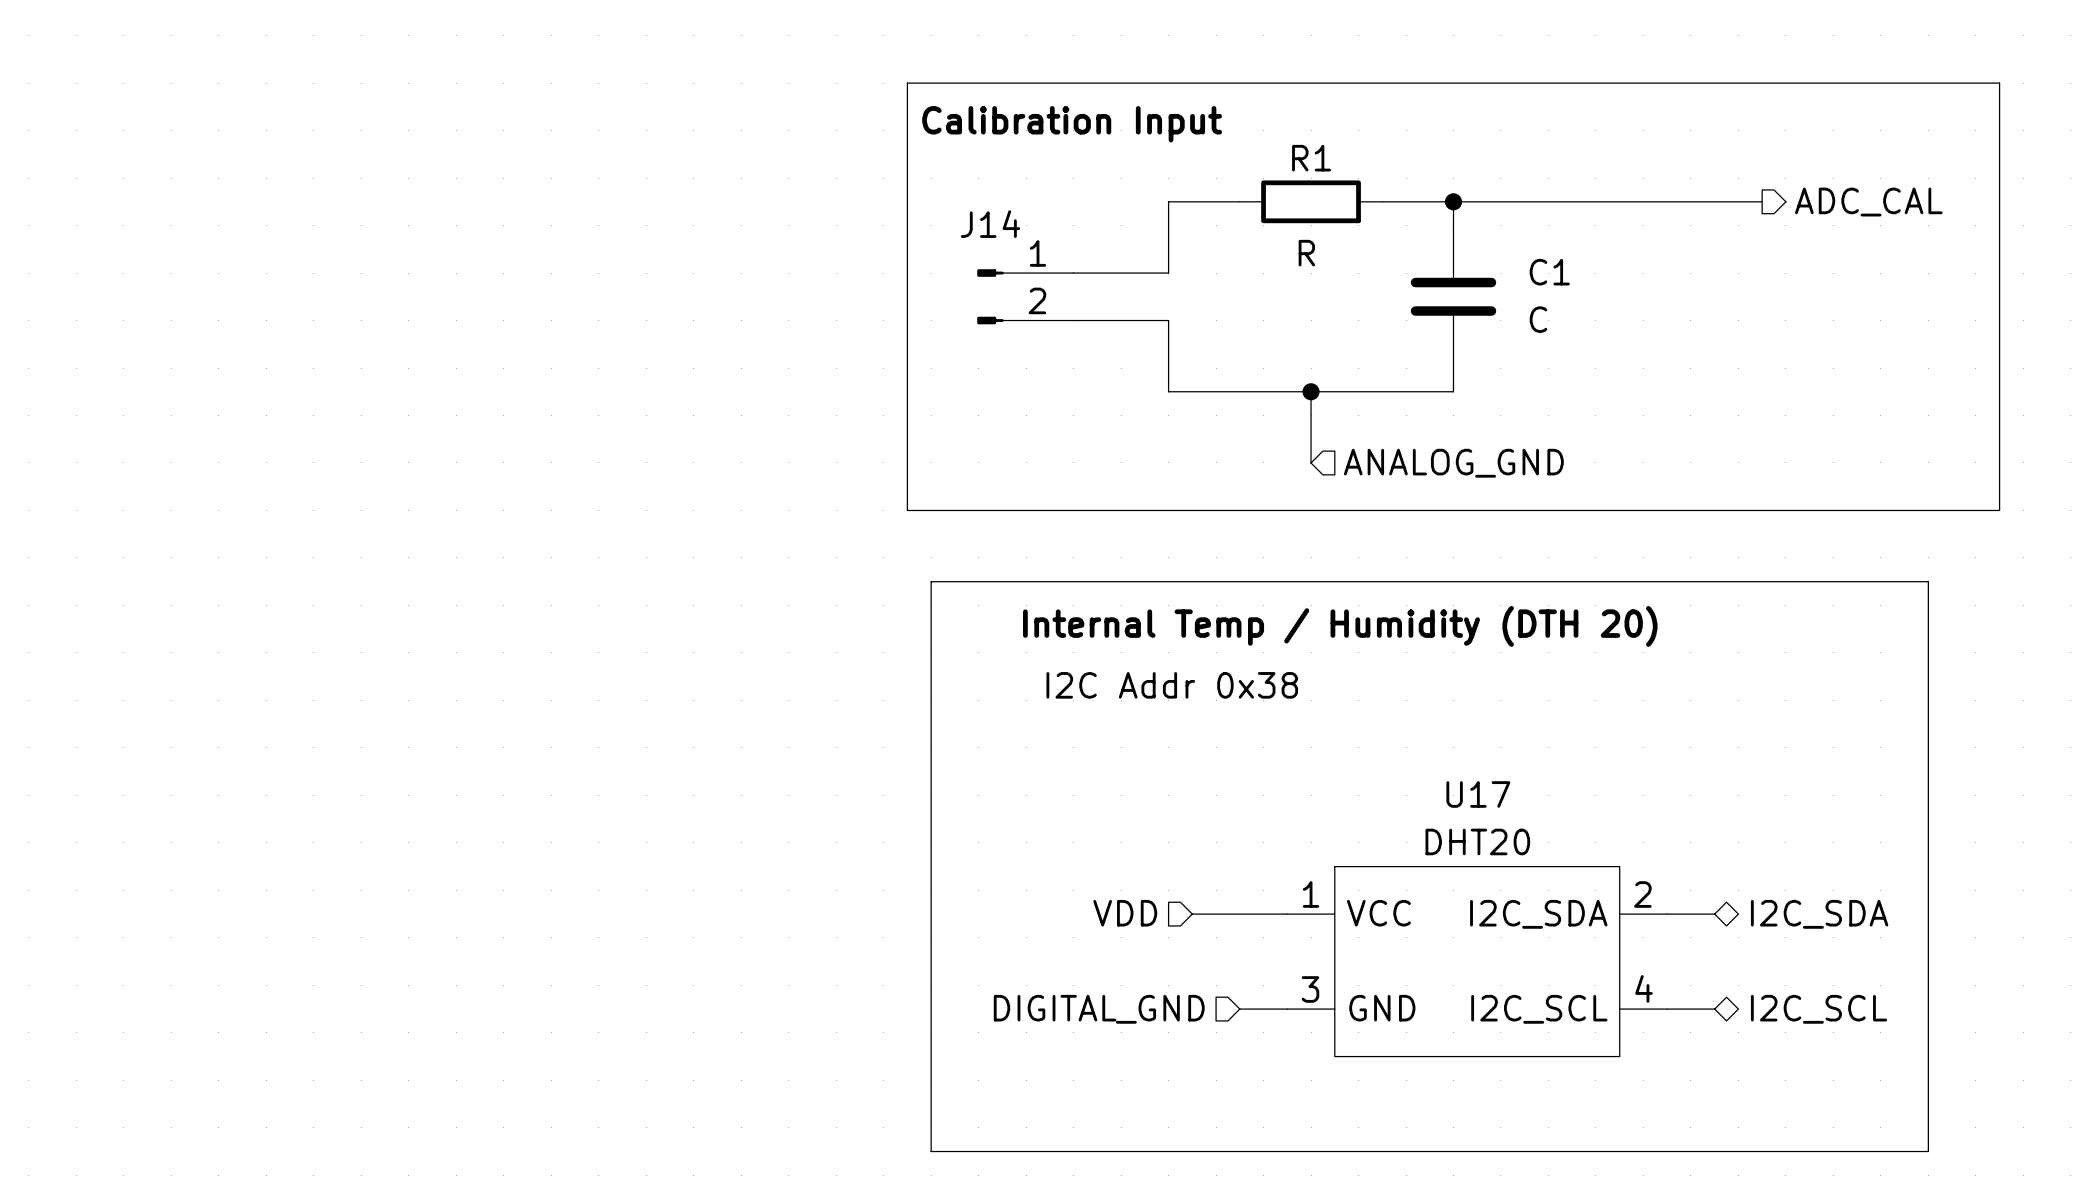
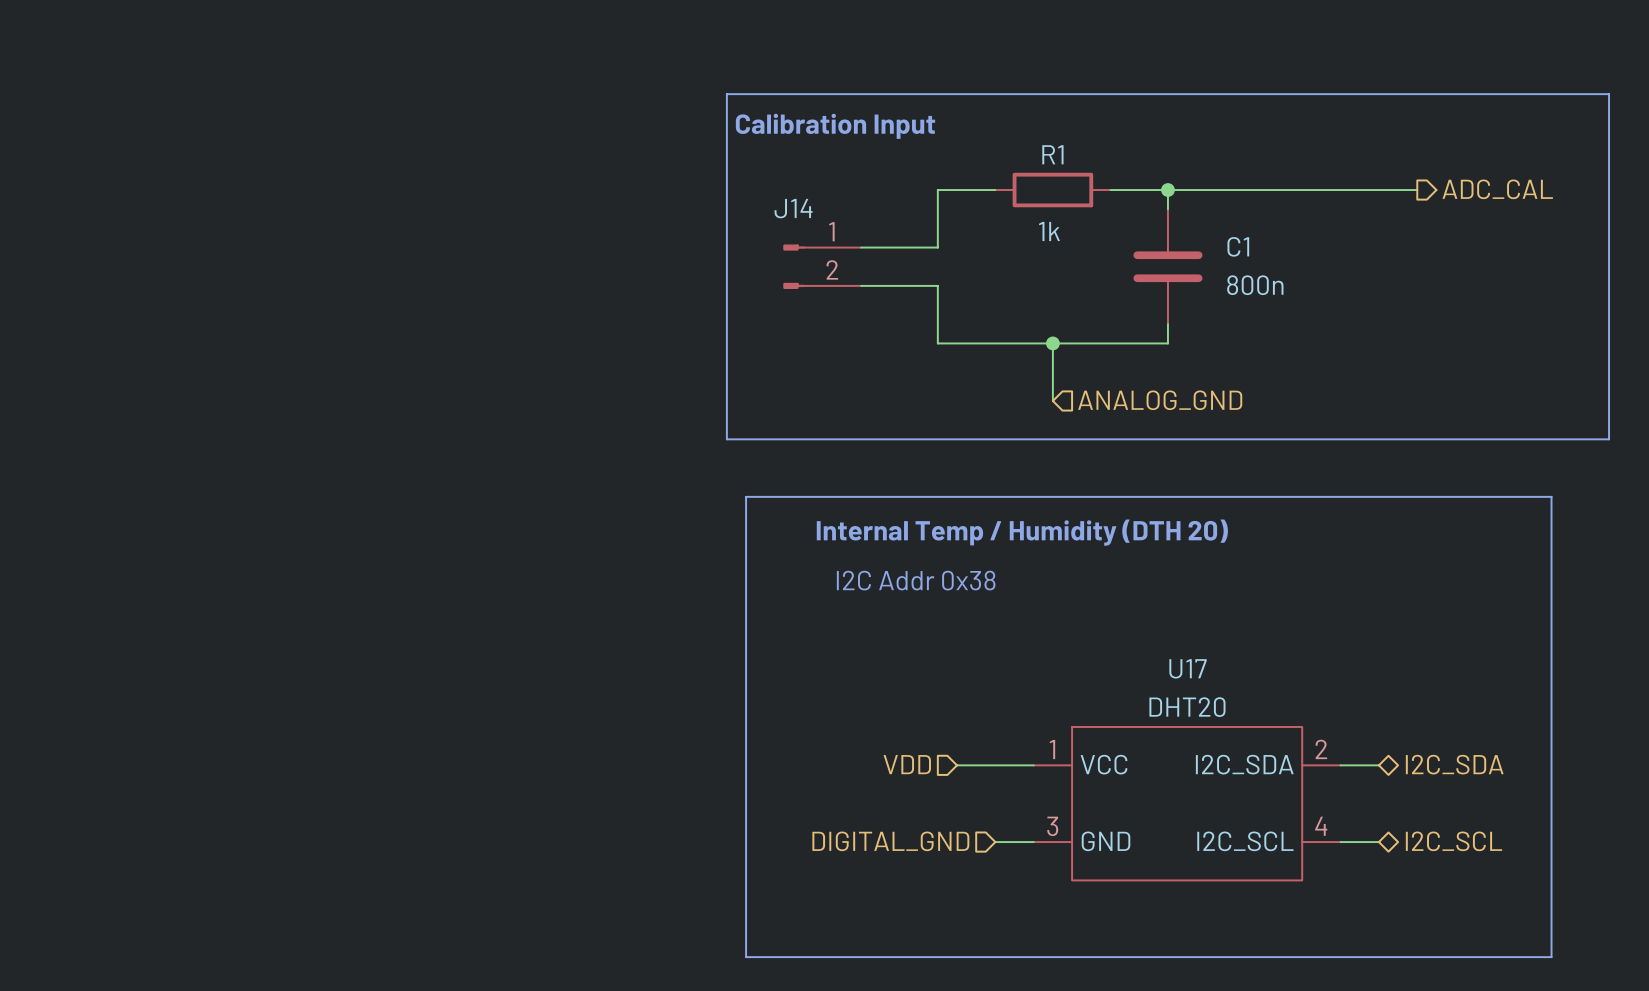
R1 value: R (1306, 253) -> 1k (1049, 231)
C1 value: C (1538, 319) -> 800n (1255, 285)

